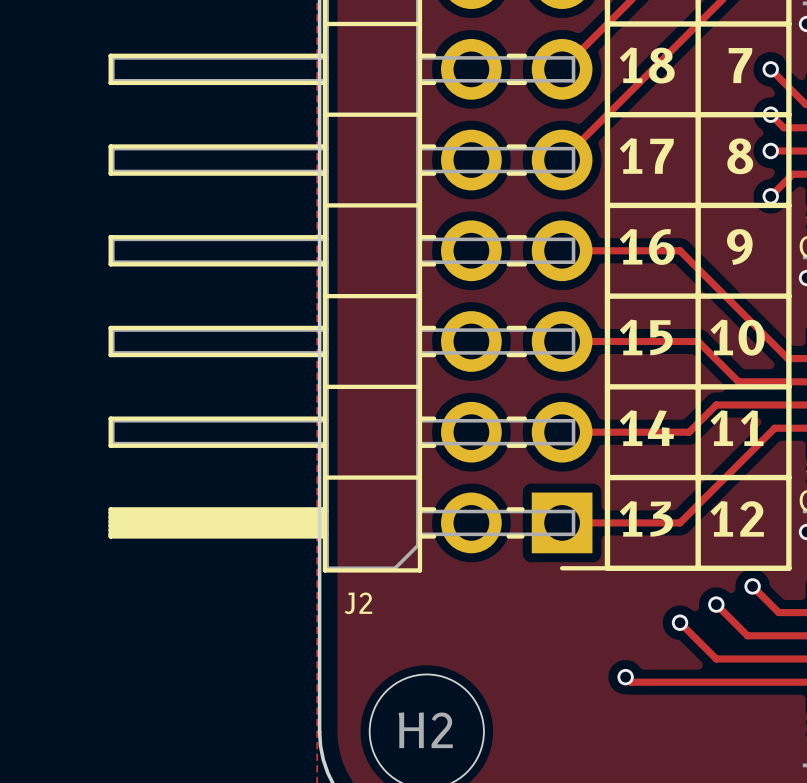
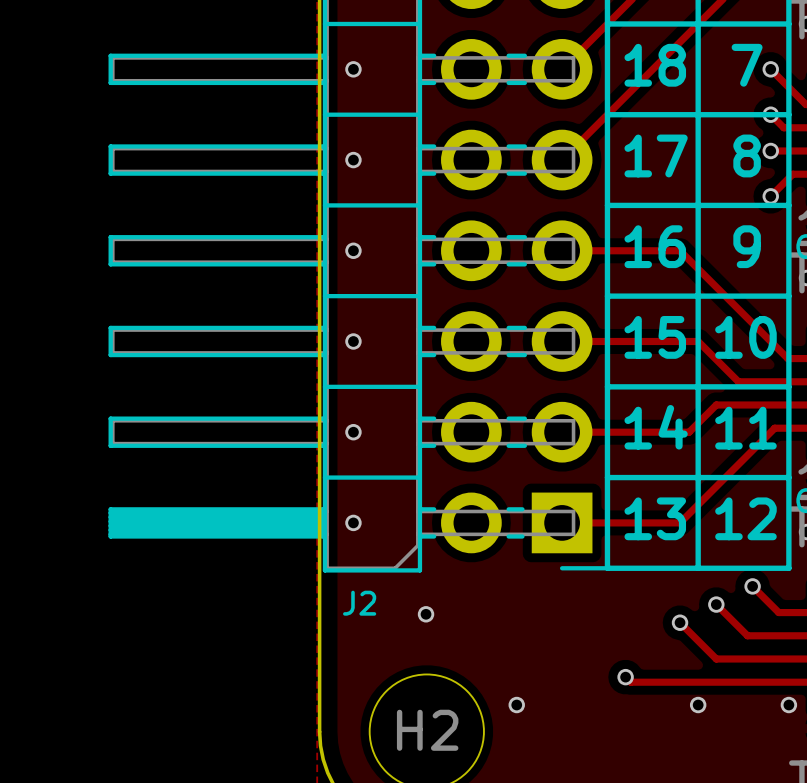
via: none -> (353, 69)
via: none -> (353, 160)
via: none -> (353, 250)
via: none -> (353, 341)
via: none -> (353, 432)
via: none -> (353, 522)
via: none -> (426, 614)
via: none -> (516, 705)
via: none -> (698, 705)
via: none -> (788, 705)

